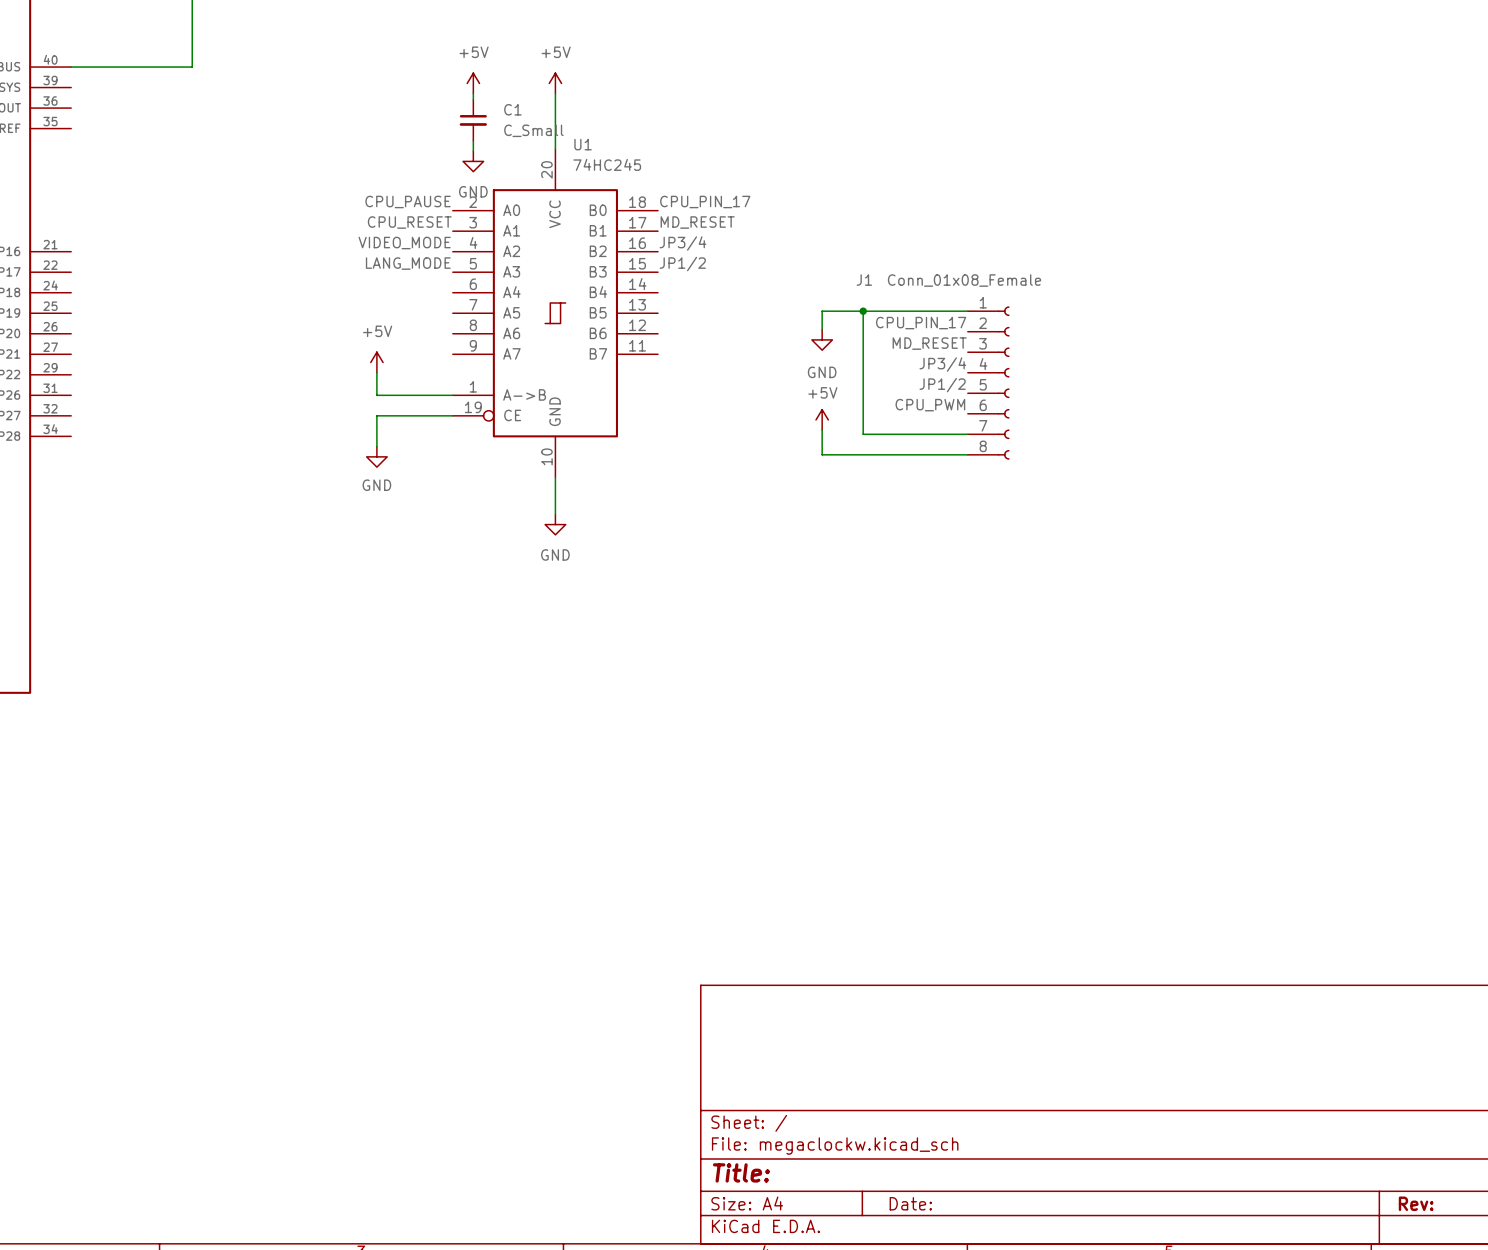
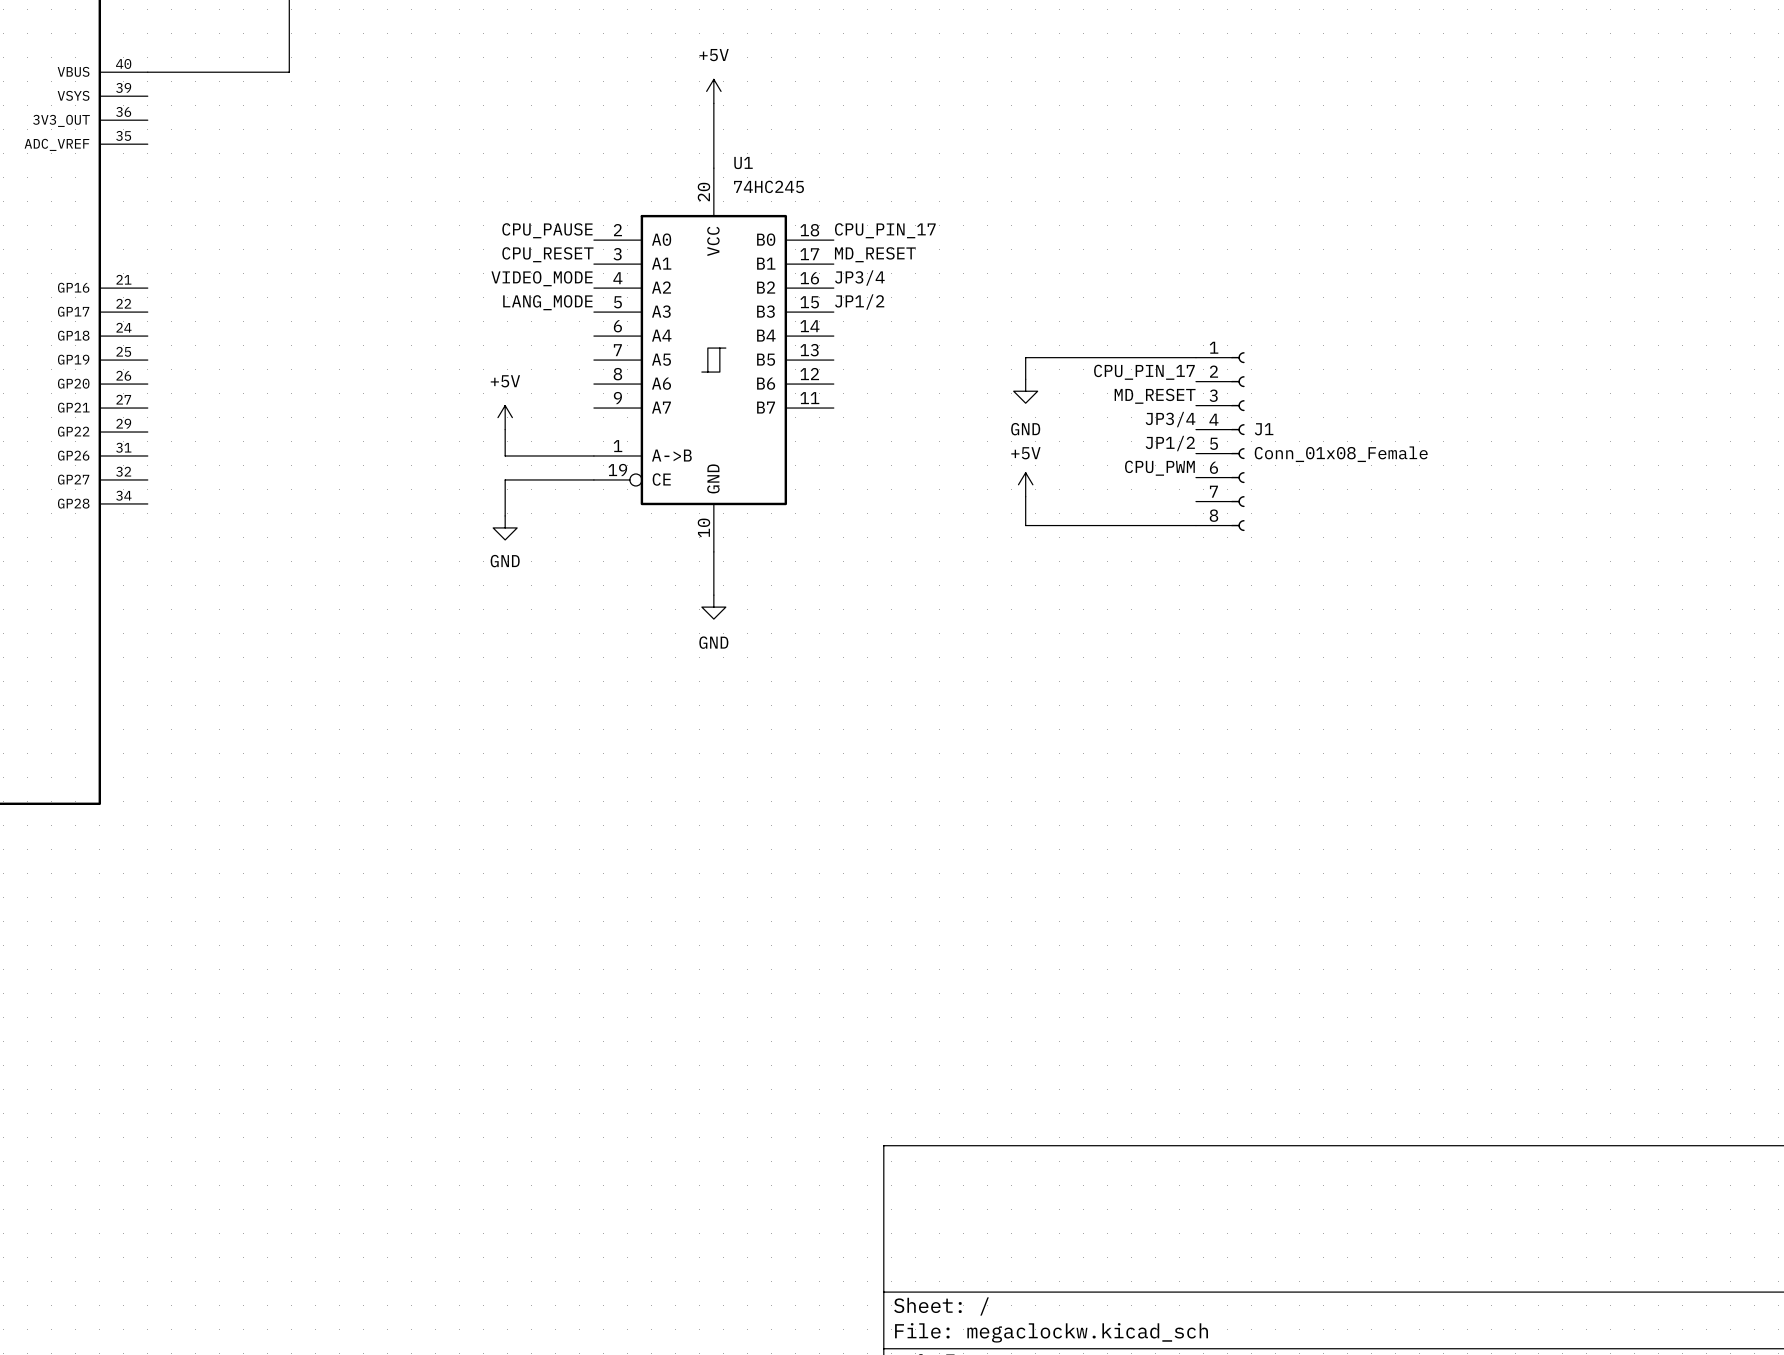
power symbol: +5V (473, 83) -> none
wire: (473, 93) (473, 99) -> none
C1: C_Small (473, 120) -> none
wire: (473, 140) (473, 151) -> none
power symbol: GND (473, 161) -> none
J1 name position: J1 (864, 280) -> J1 (1264, 429)
J1 value position: Conn_01x08_Female (964, 280) -> Conn_01x08_Female (1341, 454)
wire: (863, 311) (863, 434) (967, 434) -> none
junction: (863, 311) -> none

